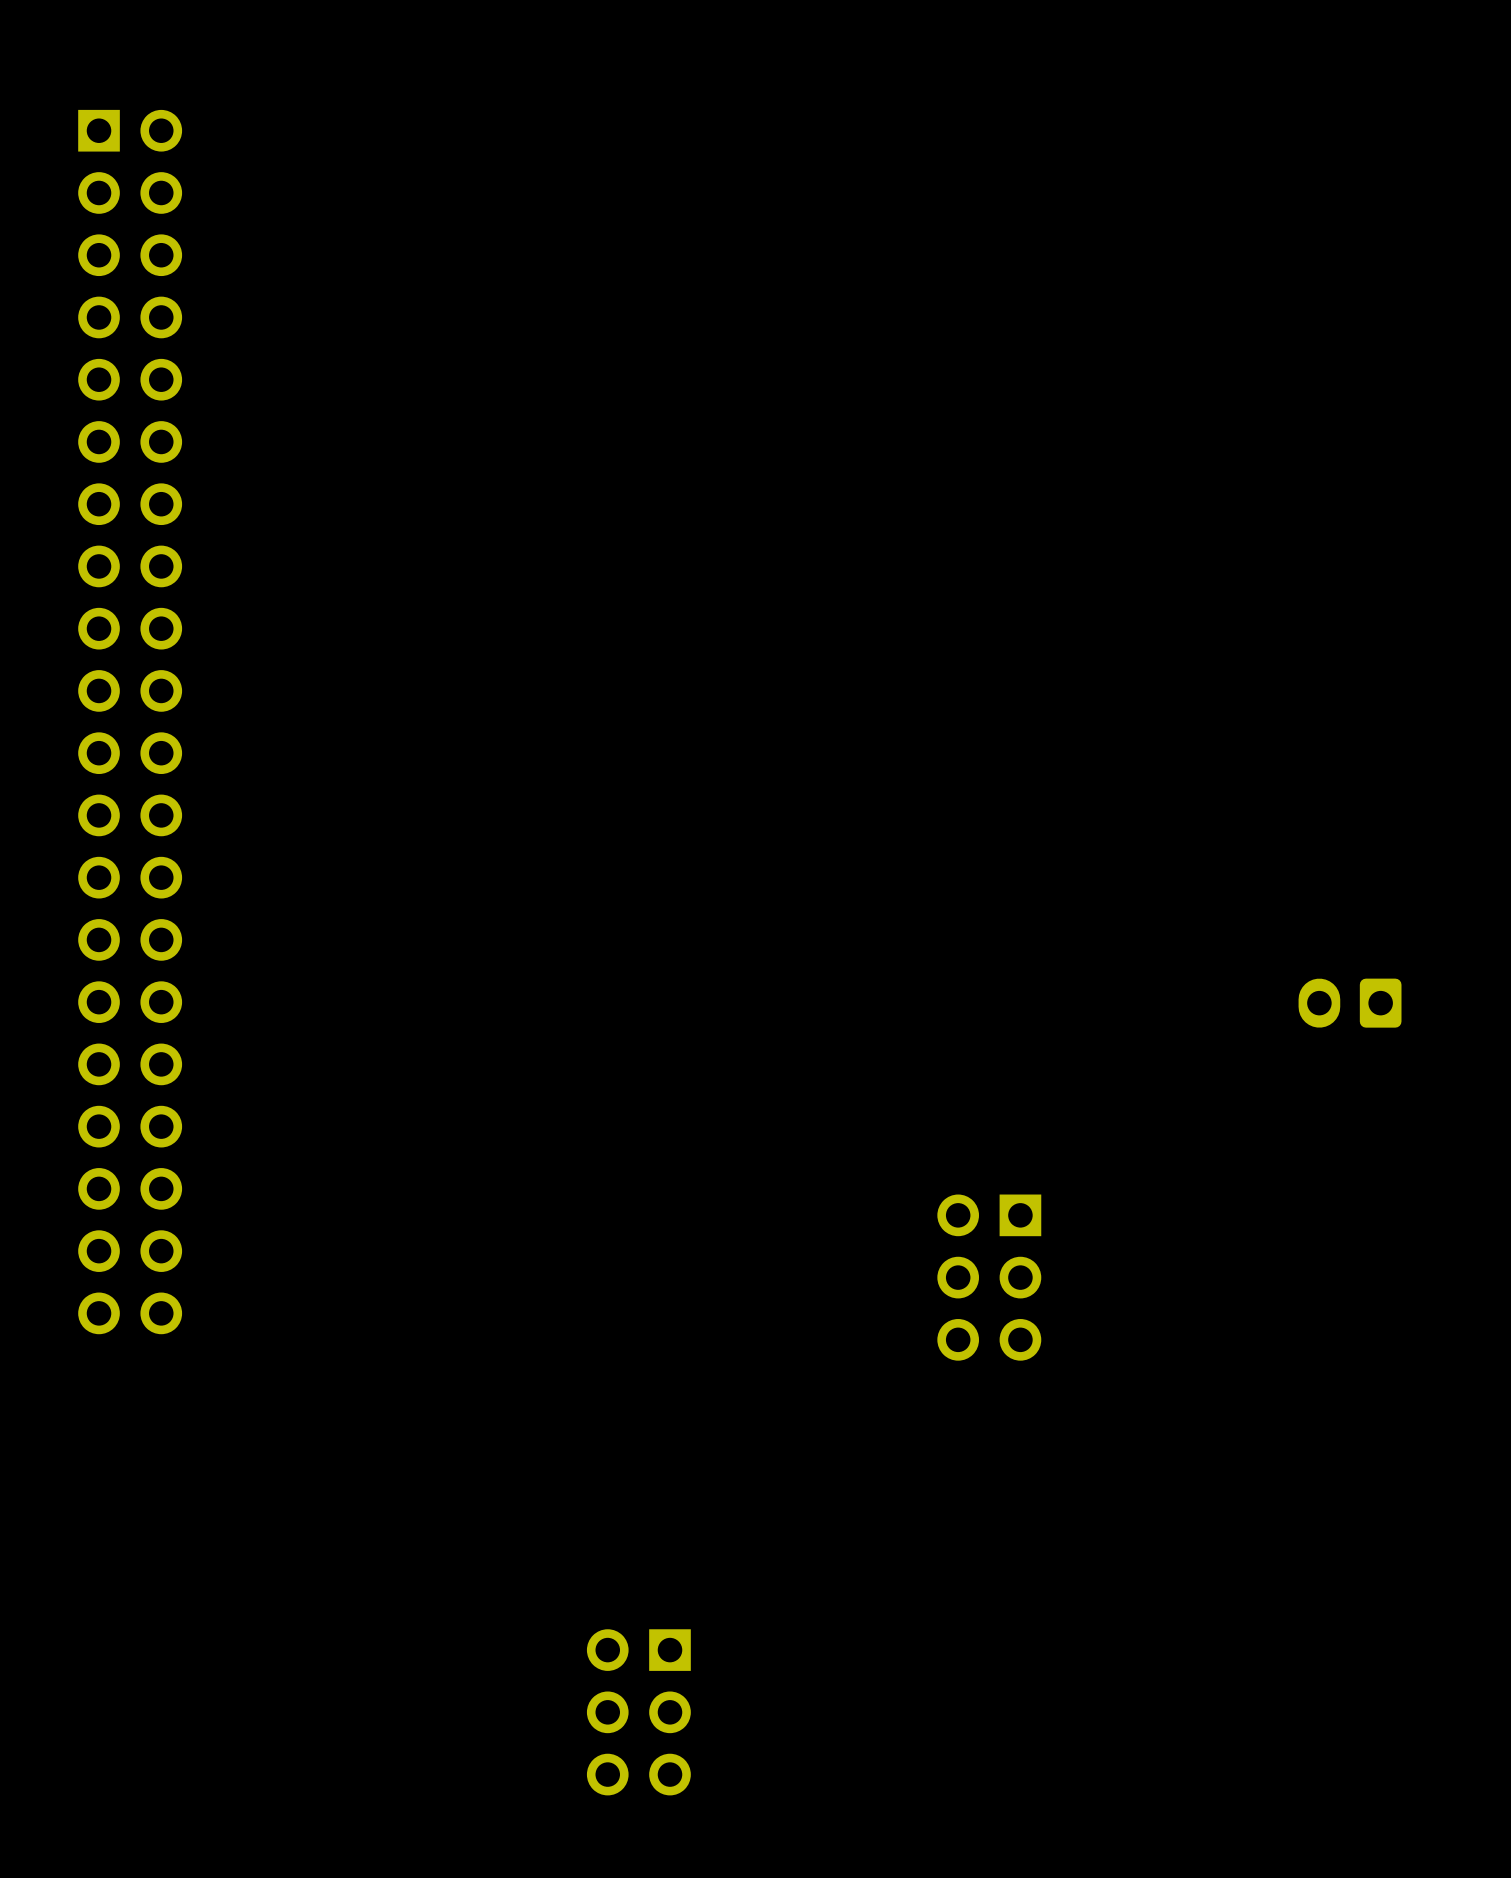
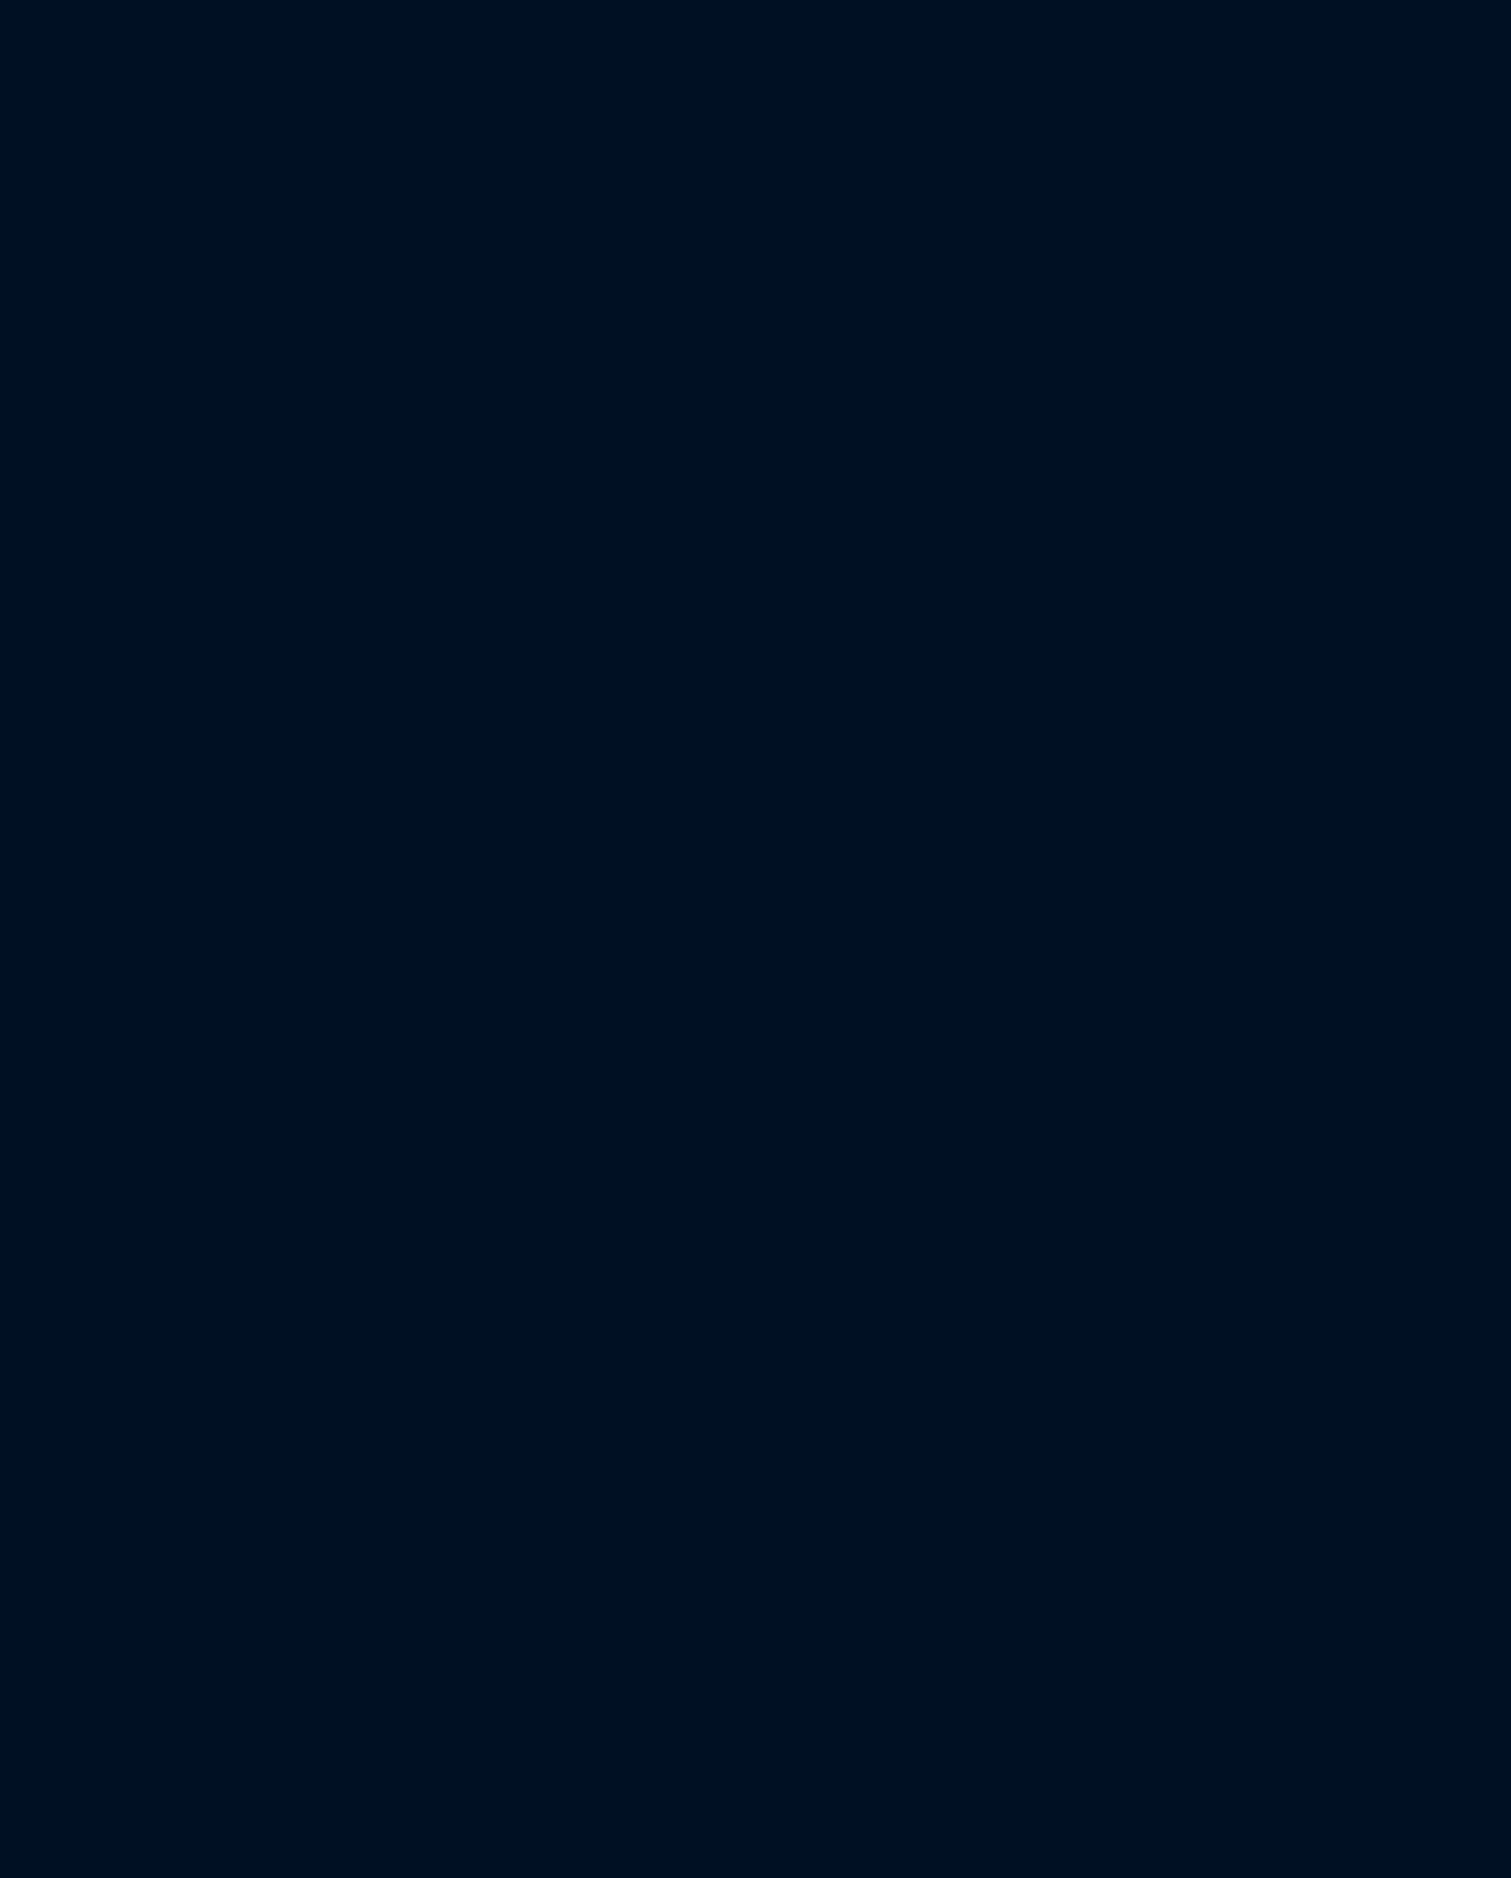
part: (130, 722) -> none
part: (1350, 1003) -> none
part: (989, 1277) -> none
part: (638, 1712) -> none

